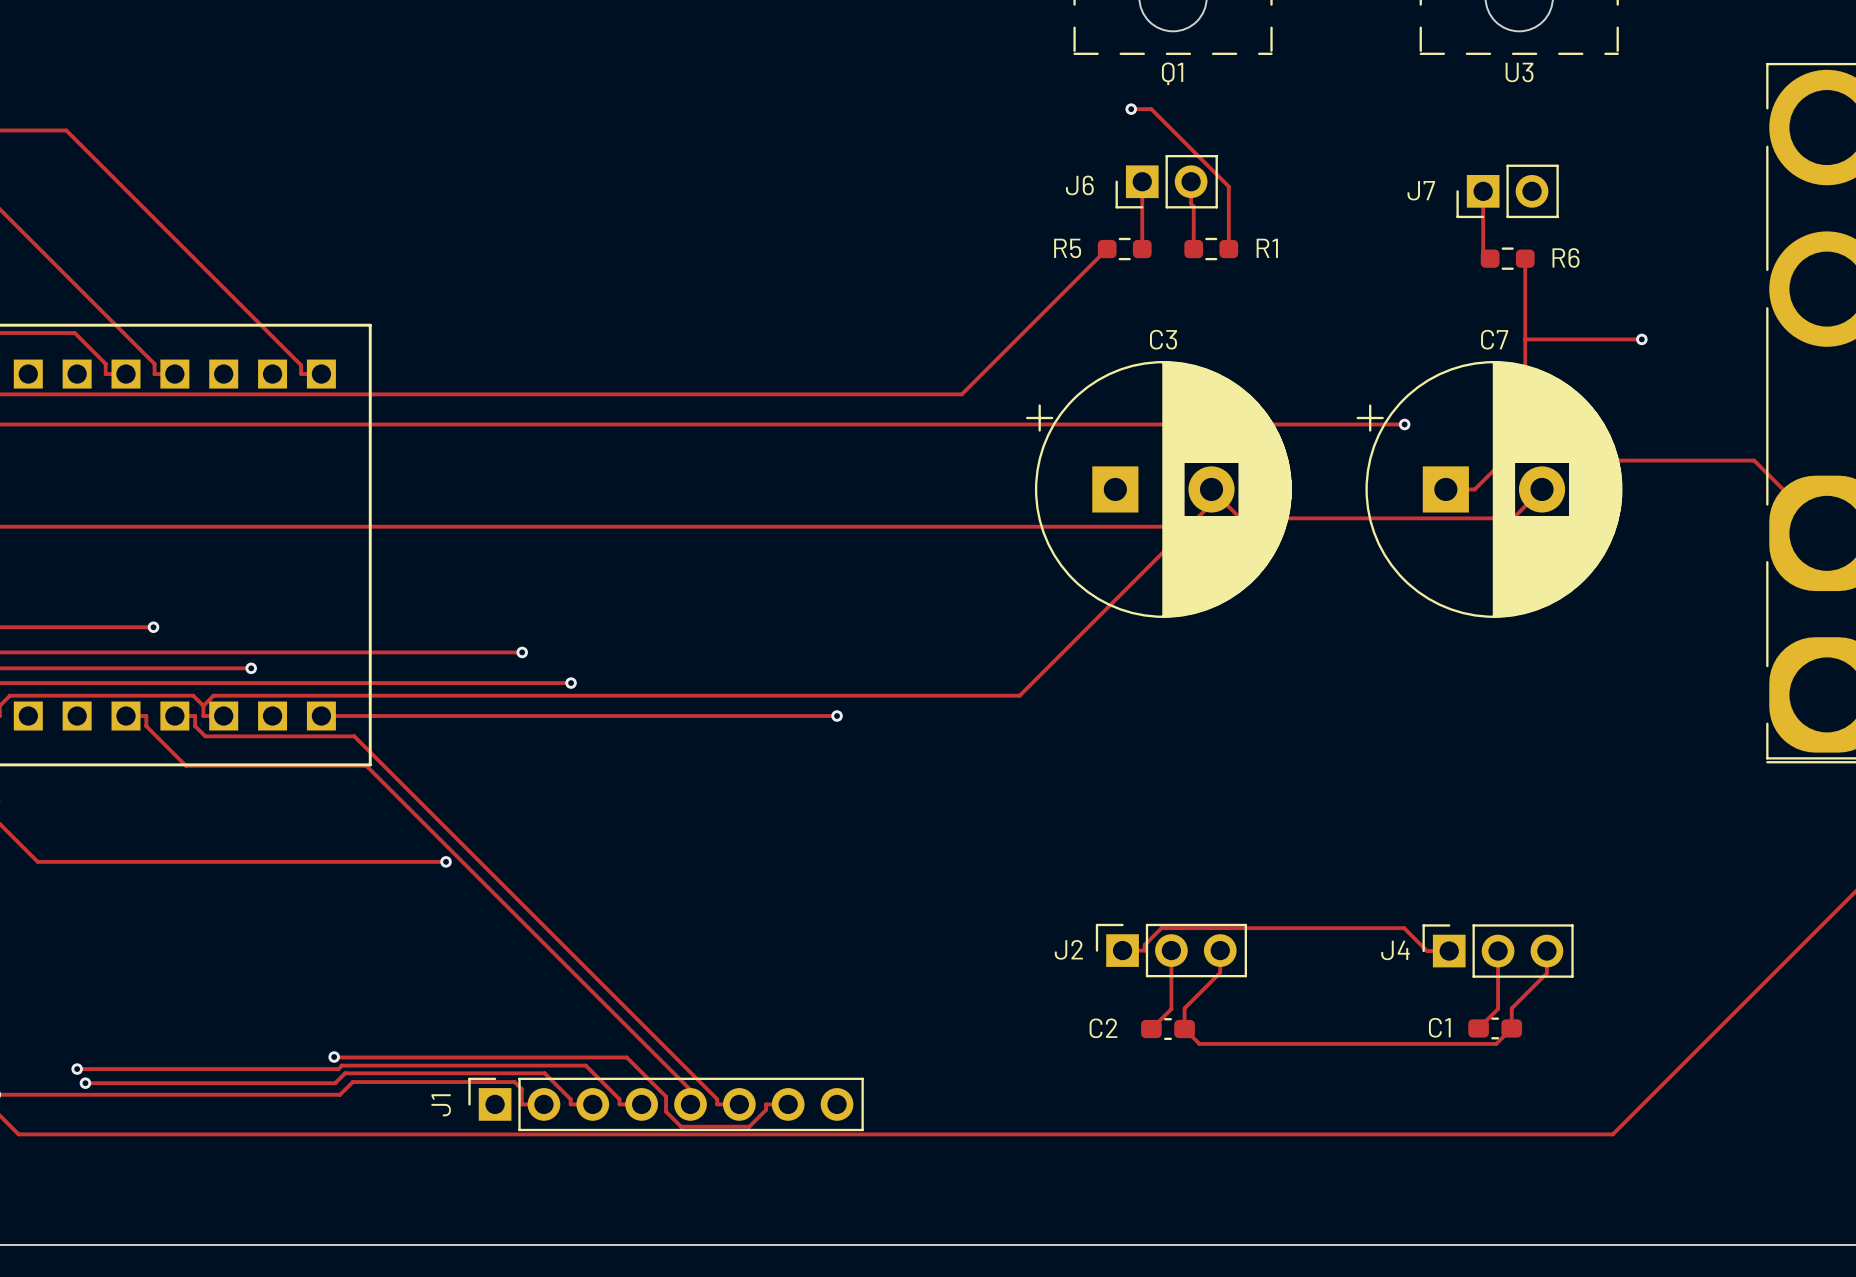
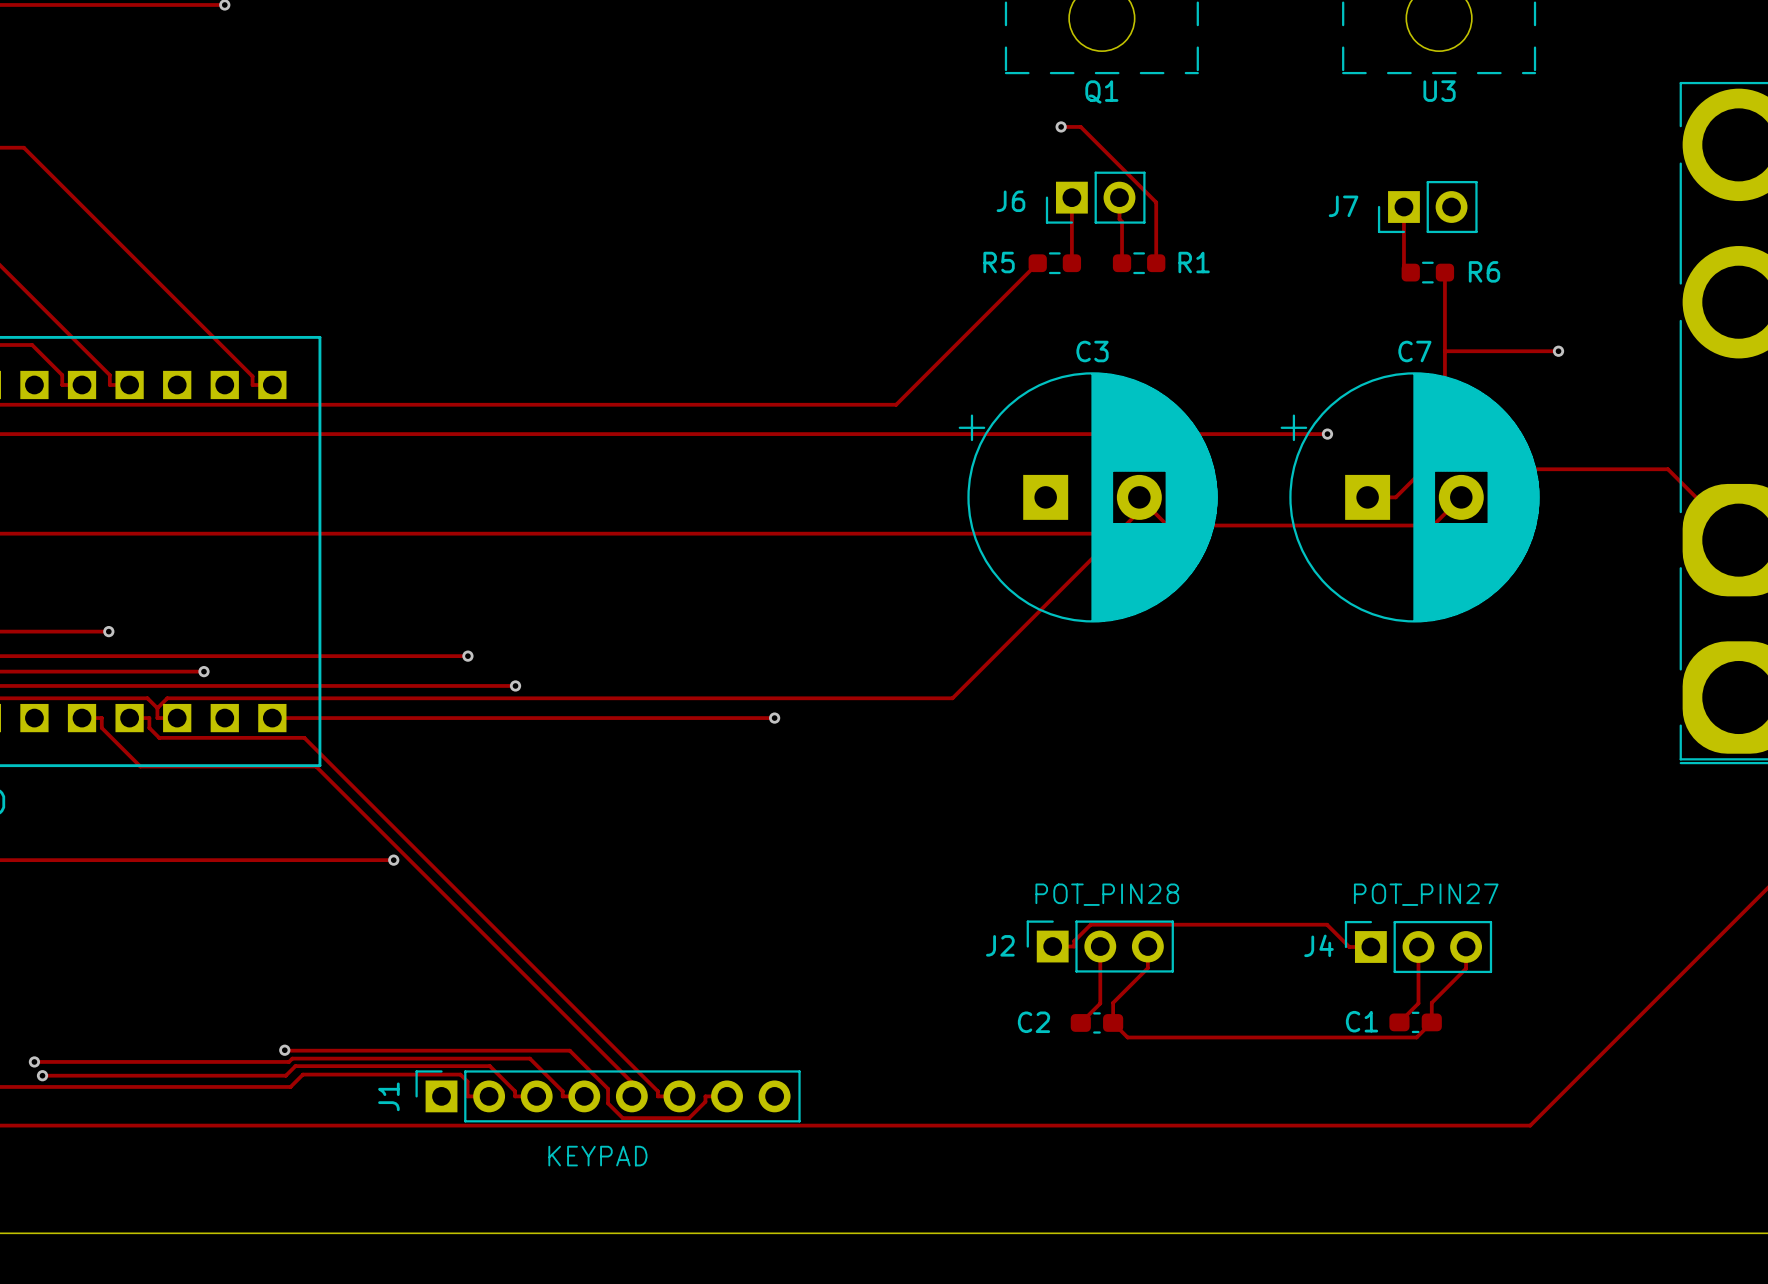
text: none -> POT_PIN28 (1107, 894)
text: none -> POT_PIN27 (1426, 894)
text: none -> KEYPAD (597, 1156)

